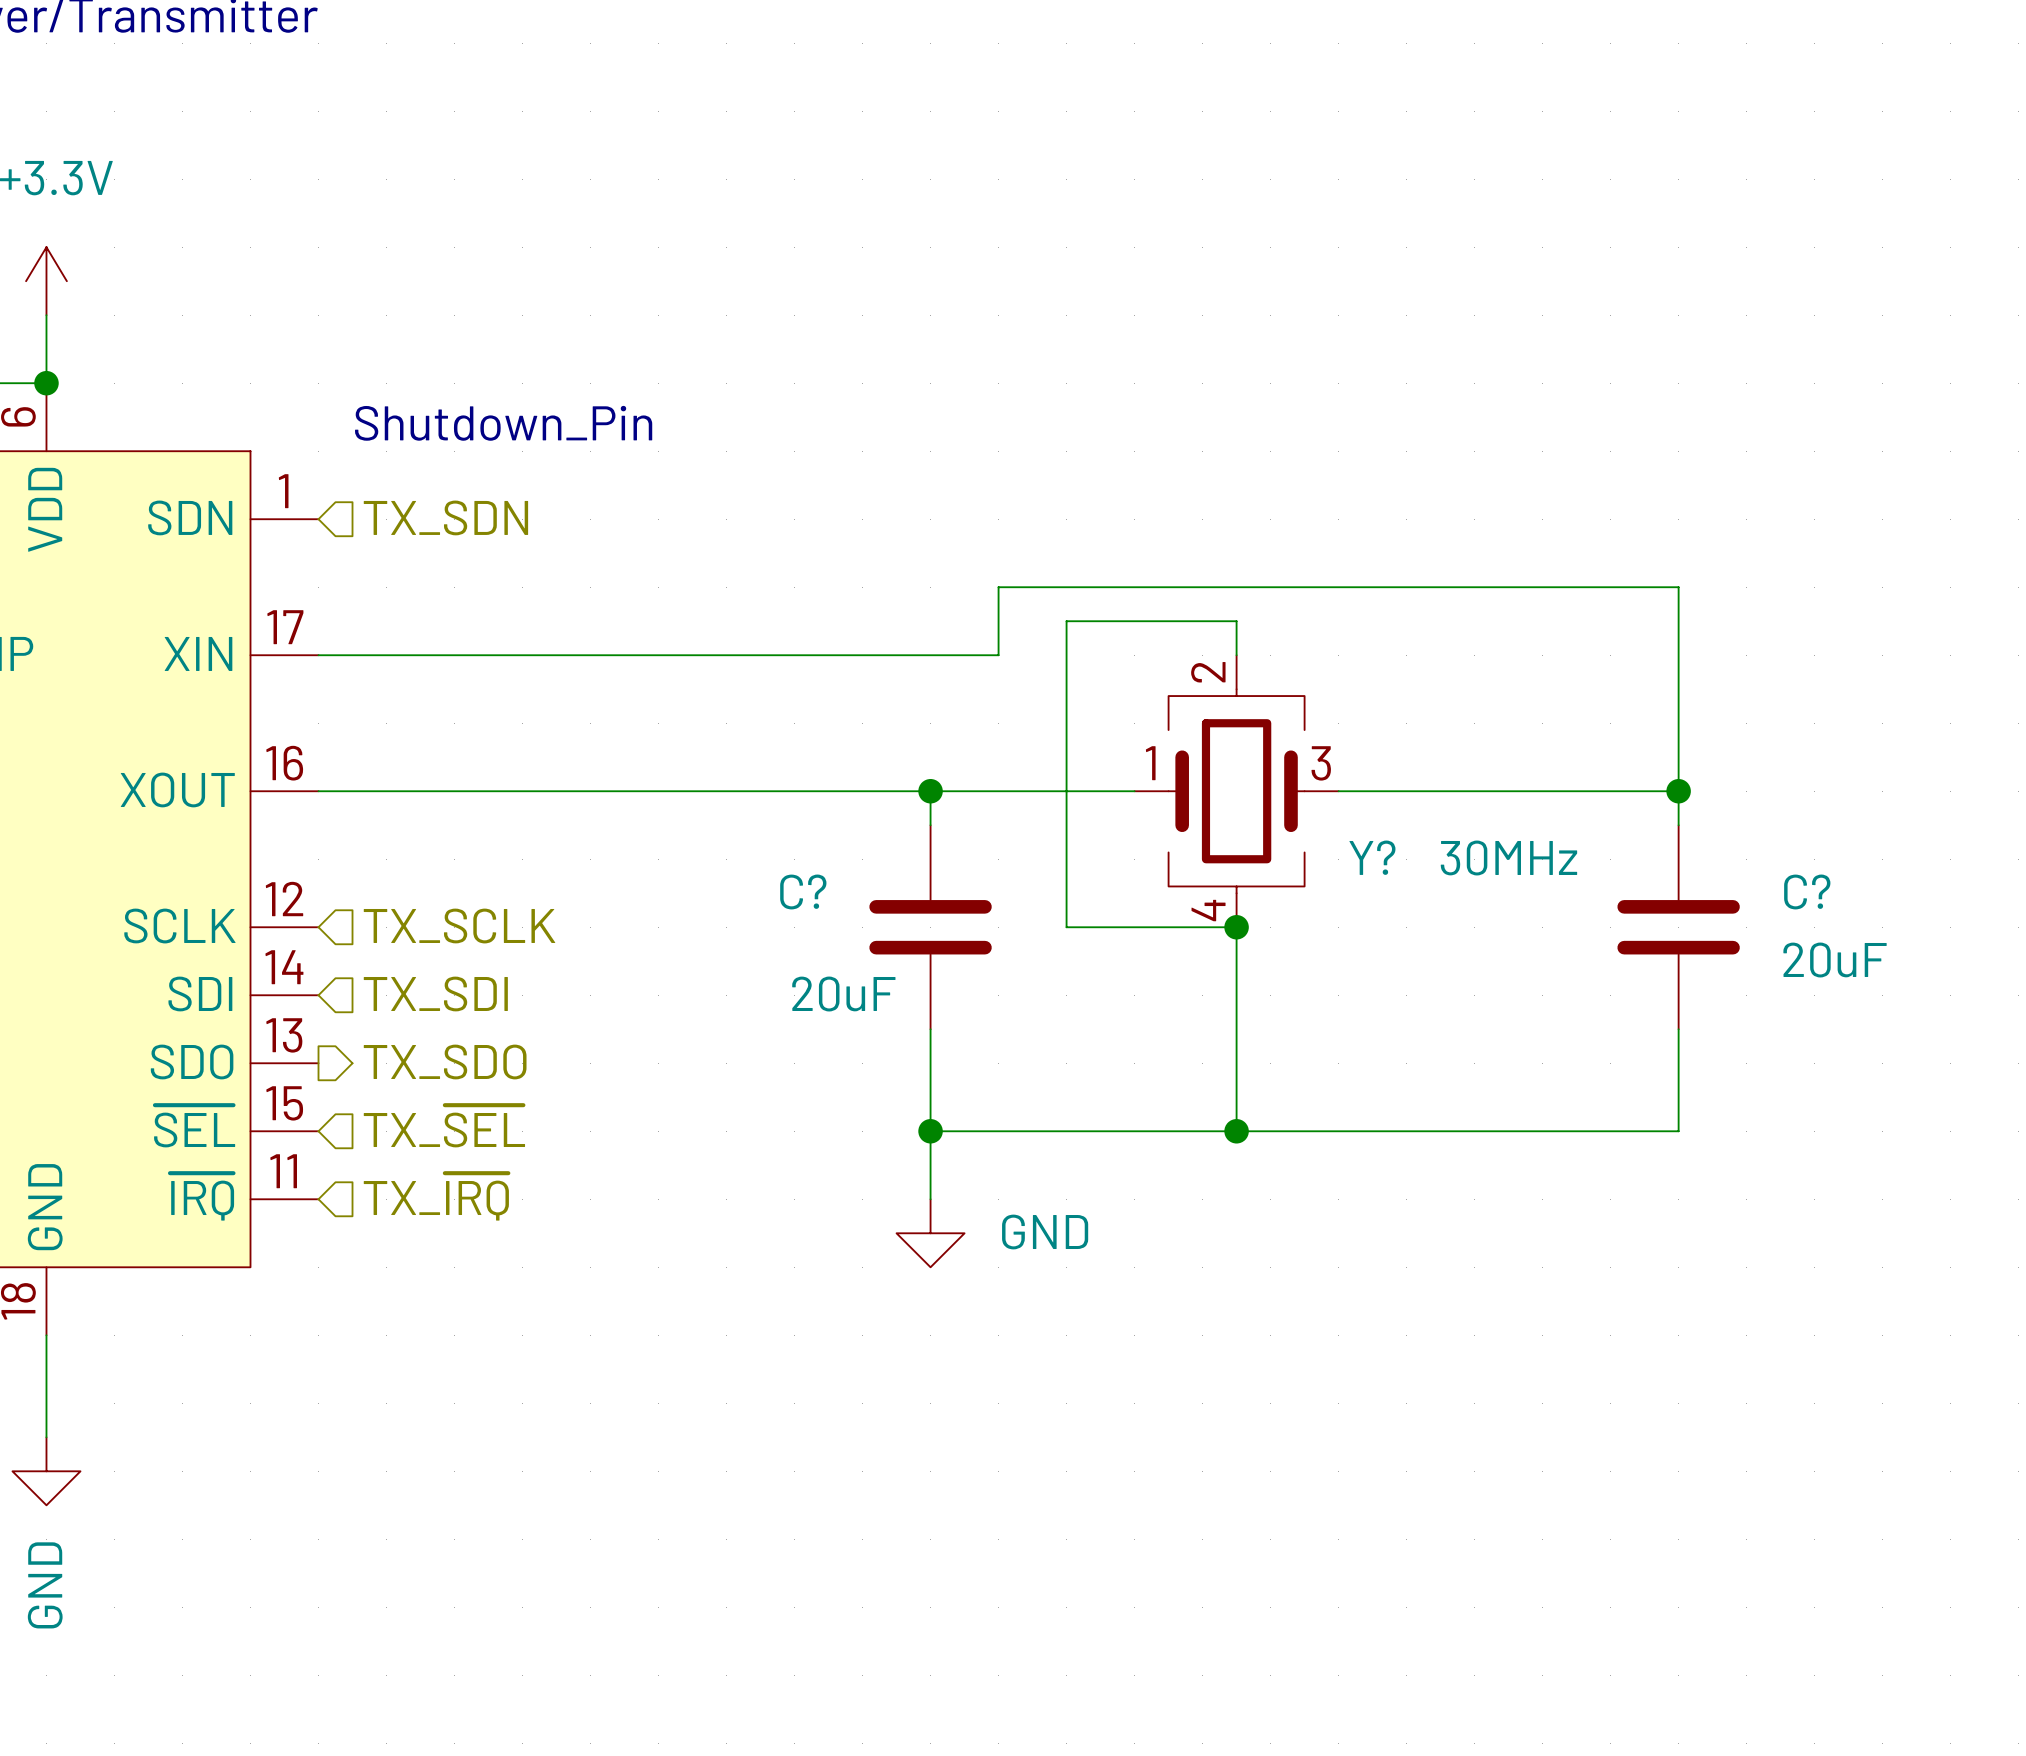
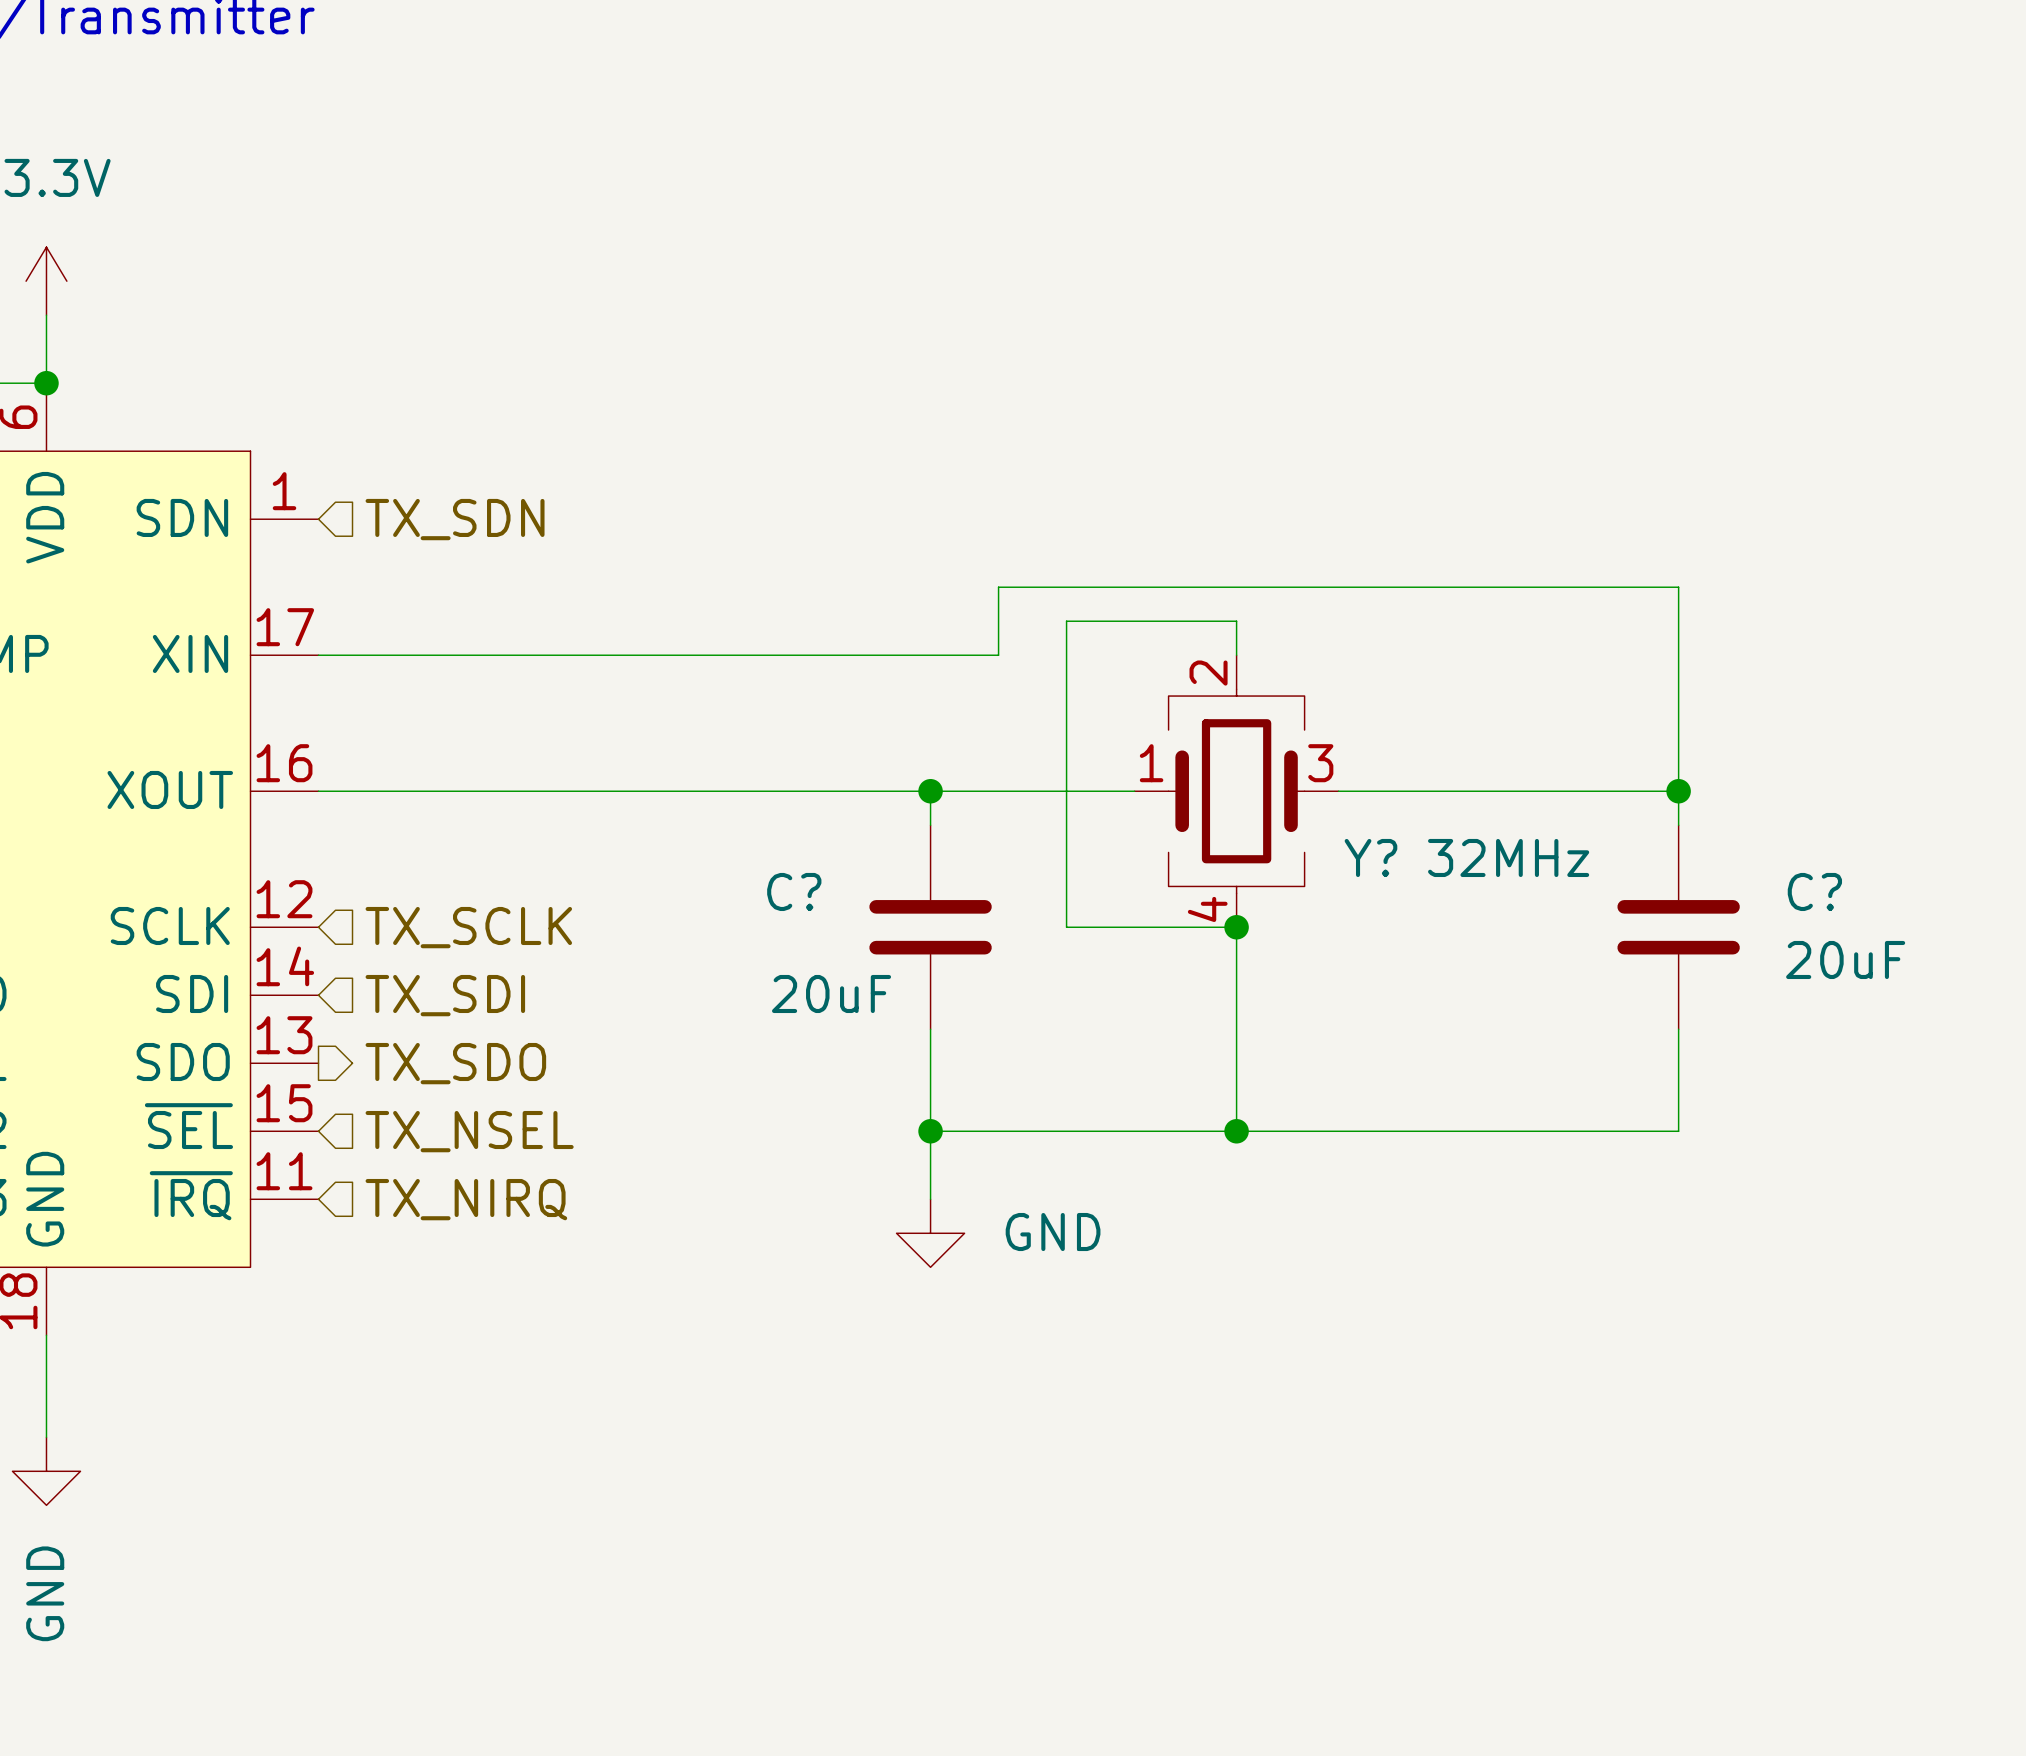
text: Shutdown_Pin (503, 423) -> none
Y? value: 30MHz (1508, 858) -> 32MHz (1508, 857)
hierarchical label: TX_~{SEL} (444, 1126) -> TX_NSEL (469, 1131)
hierarchical label: TX_~{IRQ} (436, 1196) -> TX_NIRQ (466, 1199)

